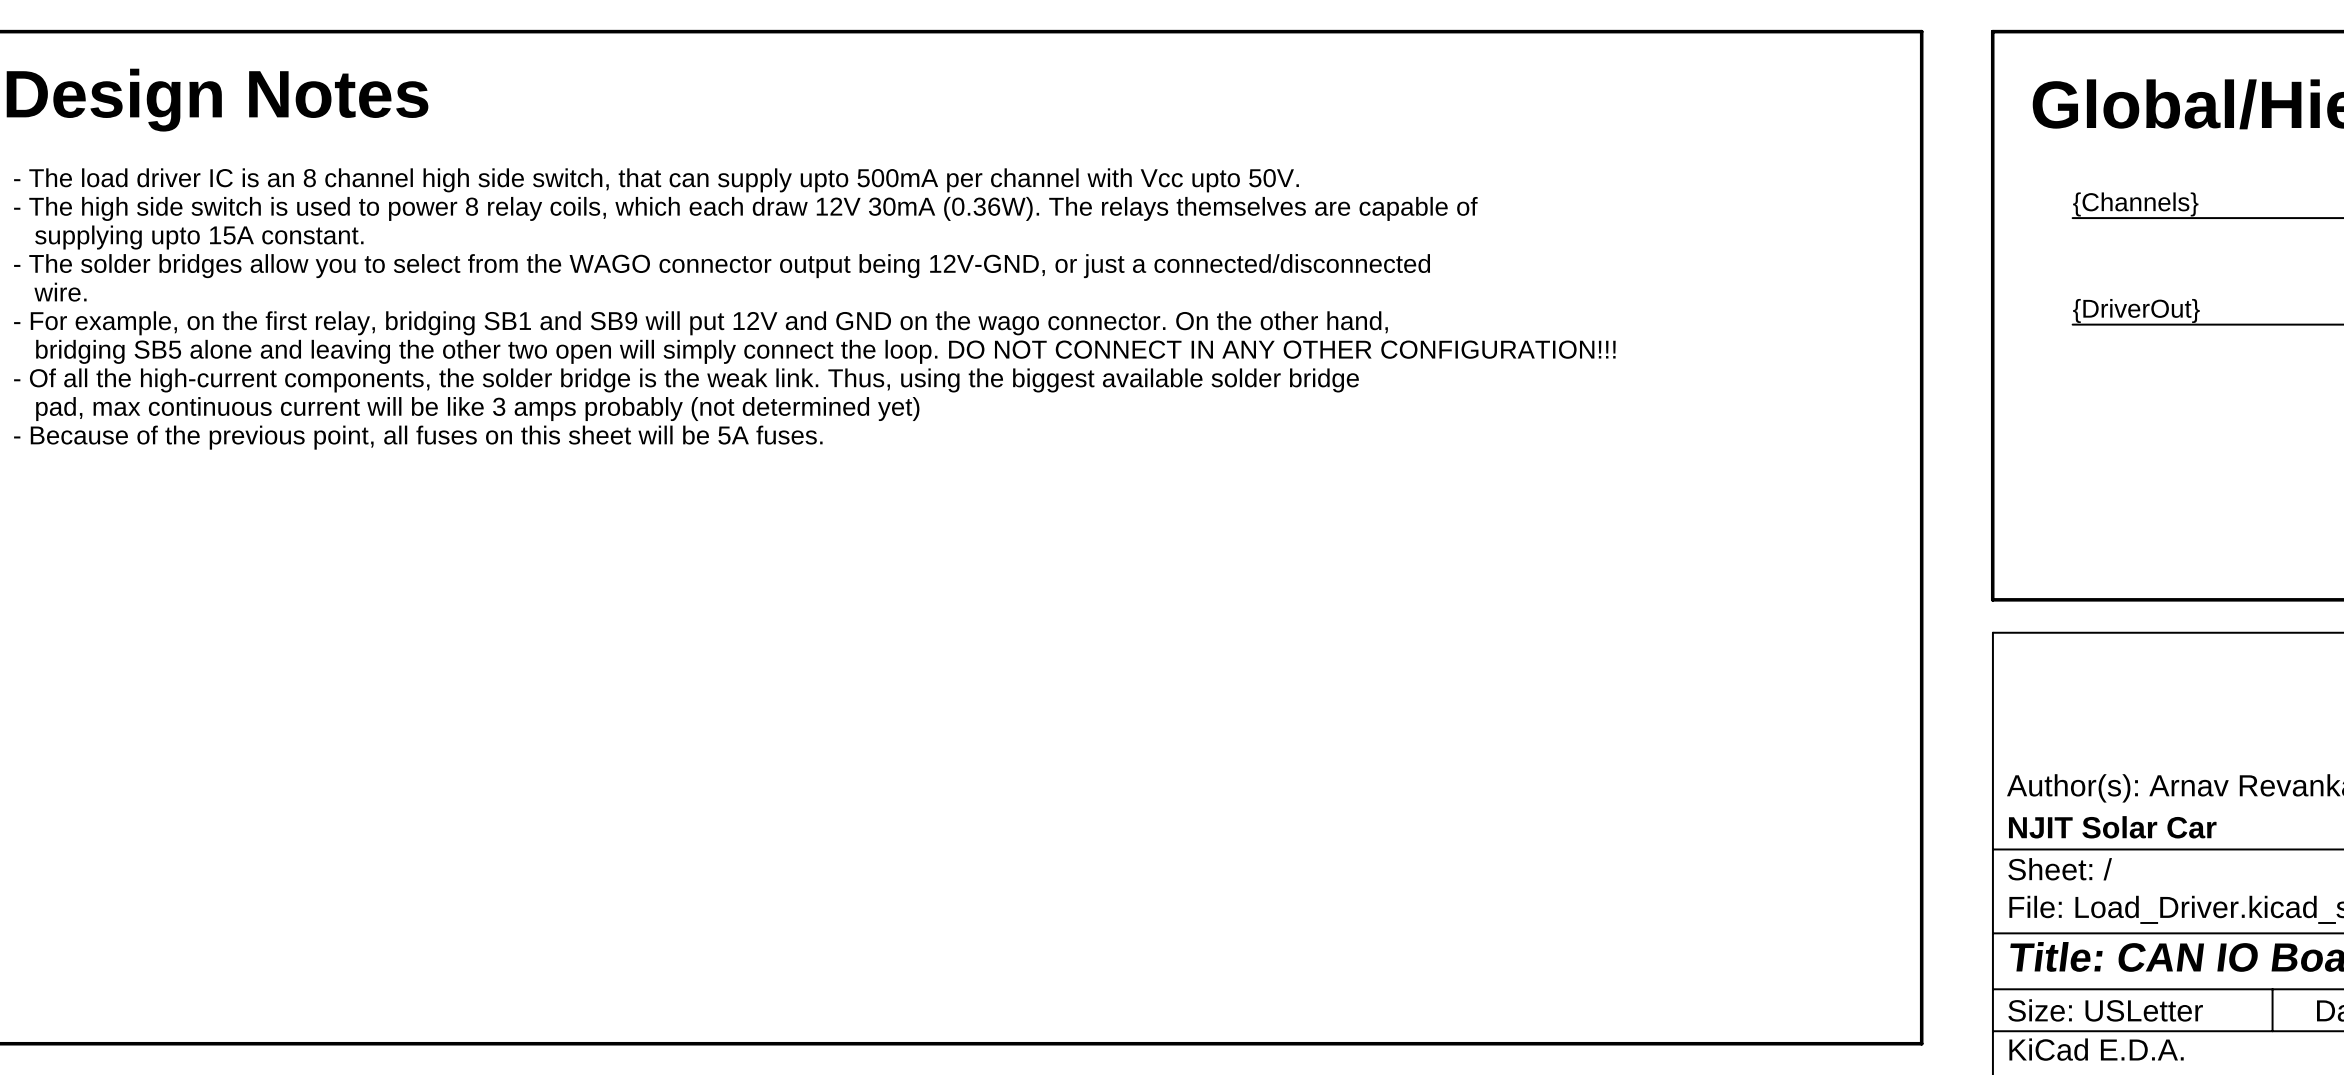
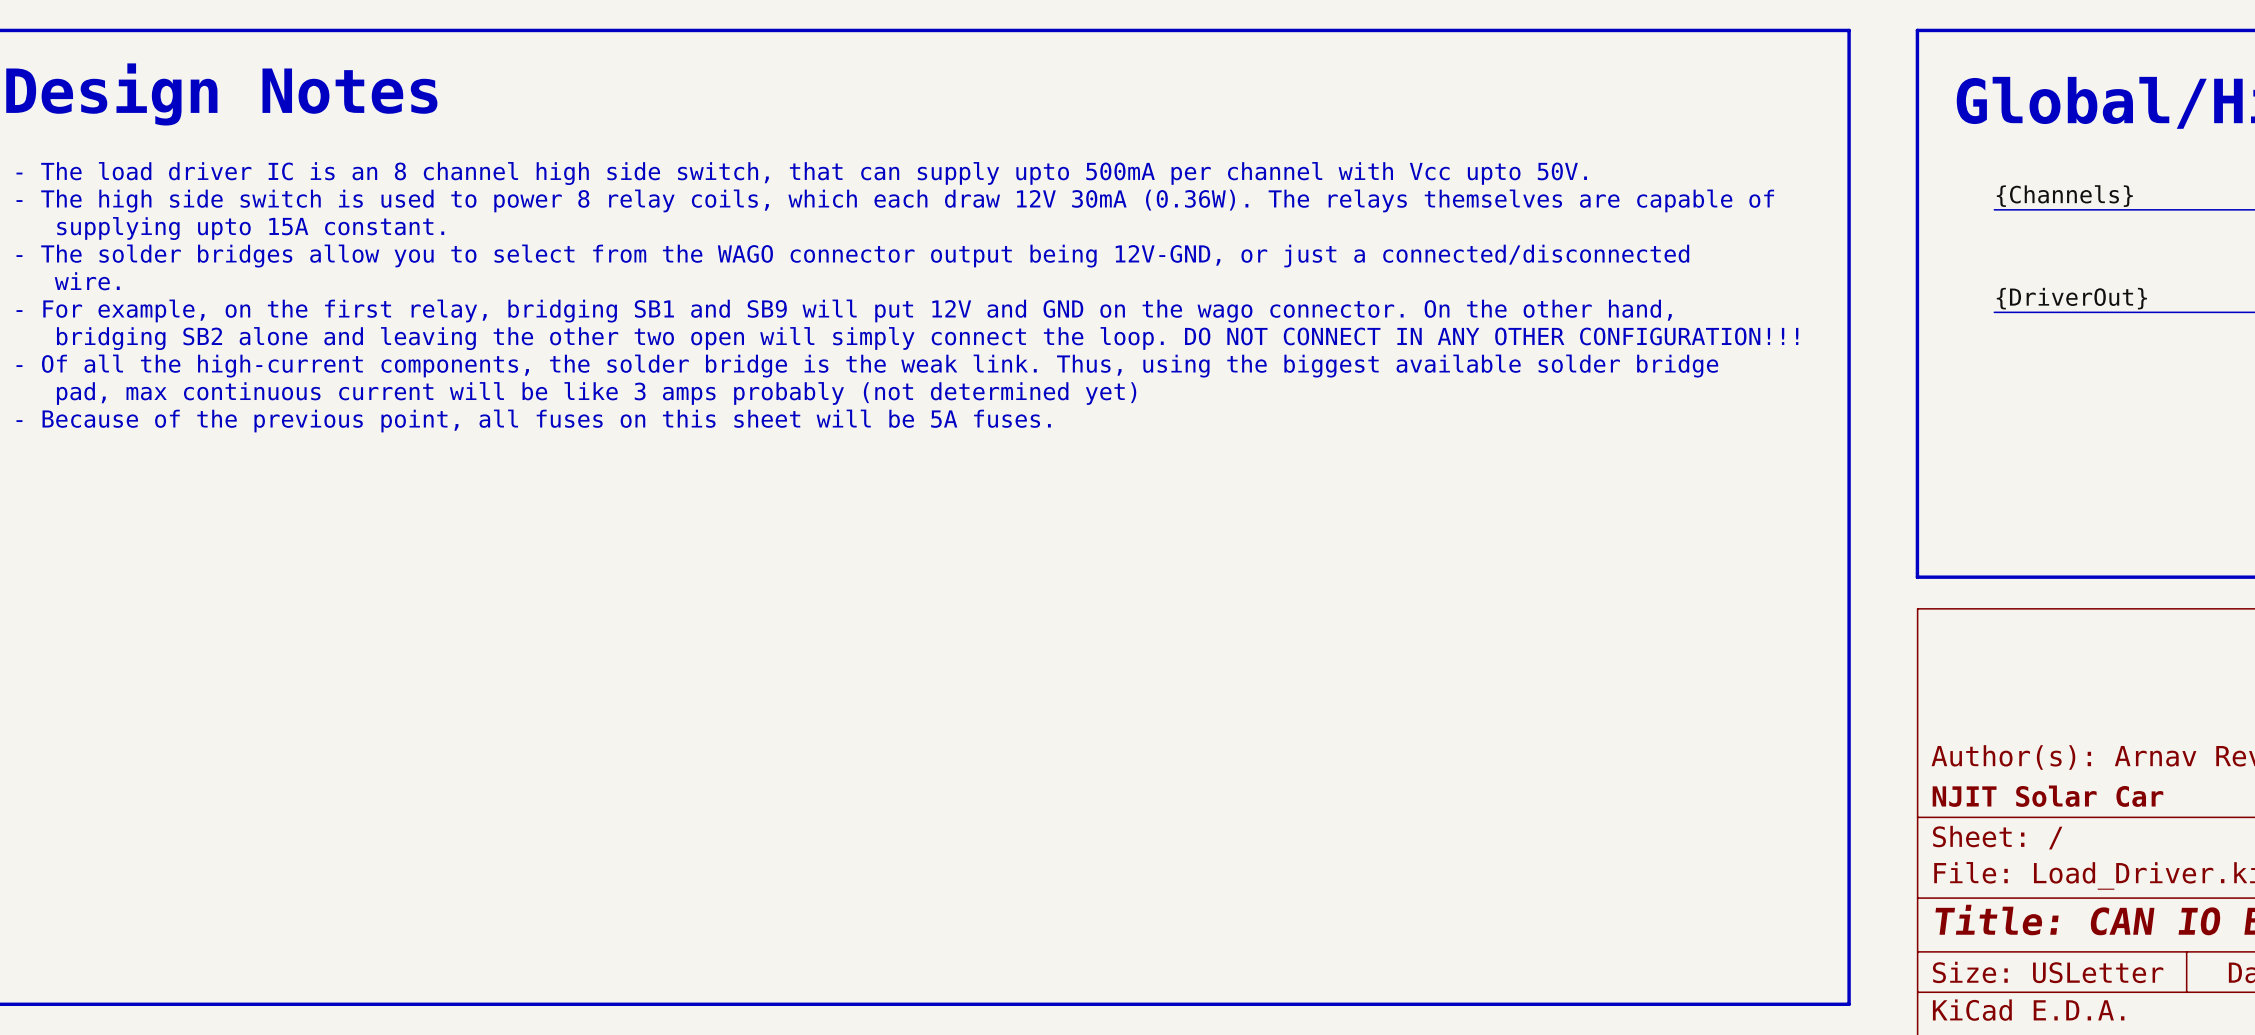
text: bridging SB5 alone and leaving the other two open will simply connect the loop. DO NOT CONNECT IN ANY OTHER CONFIGURATION!!! (825, 351) -> bridging SB2 alone and leaving the other two open will simply connect the loop. DO NOT CONNECT IN ANY OTHER CONFIGURATION!!! (927, 338)

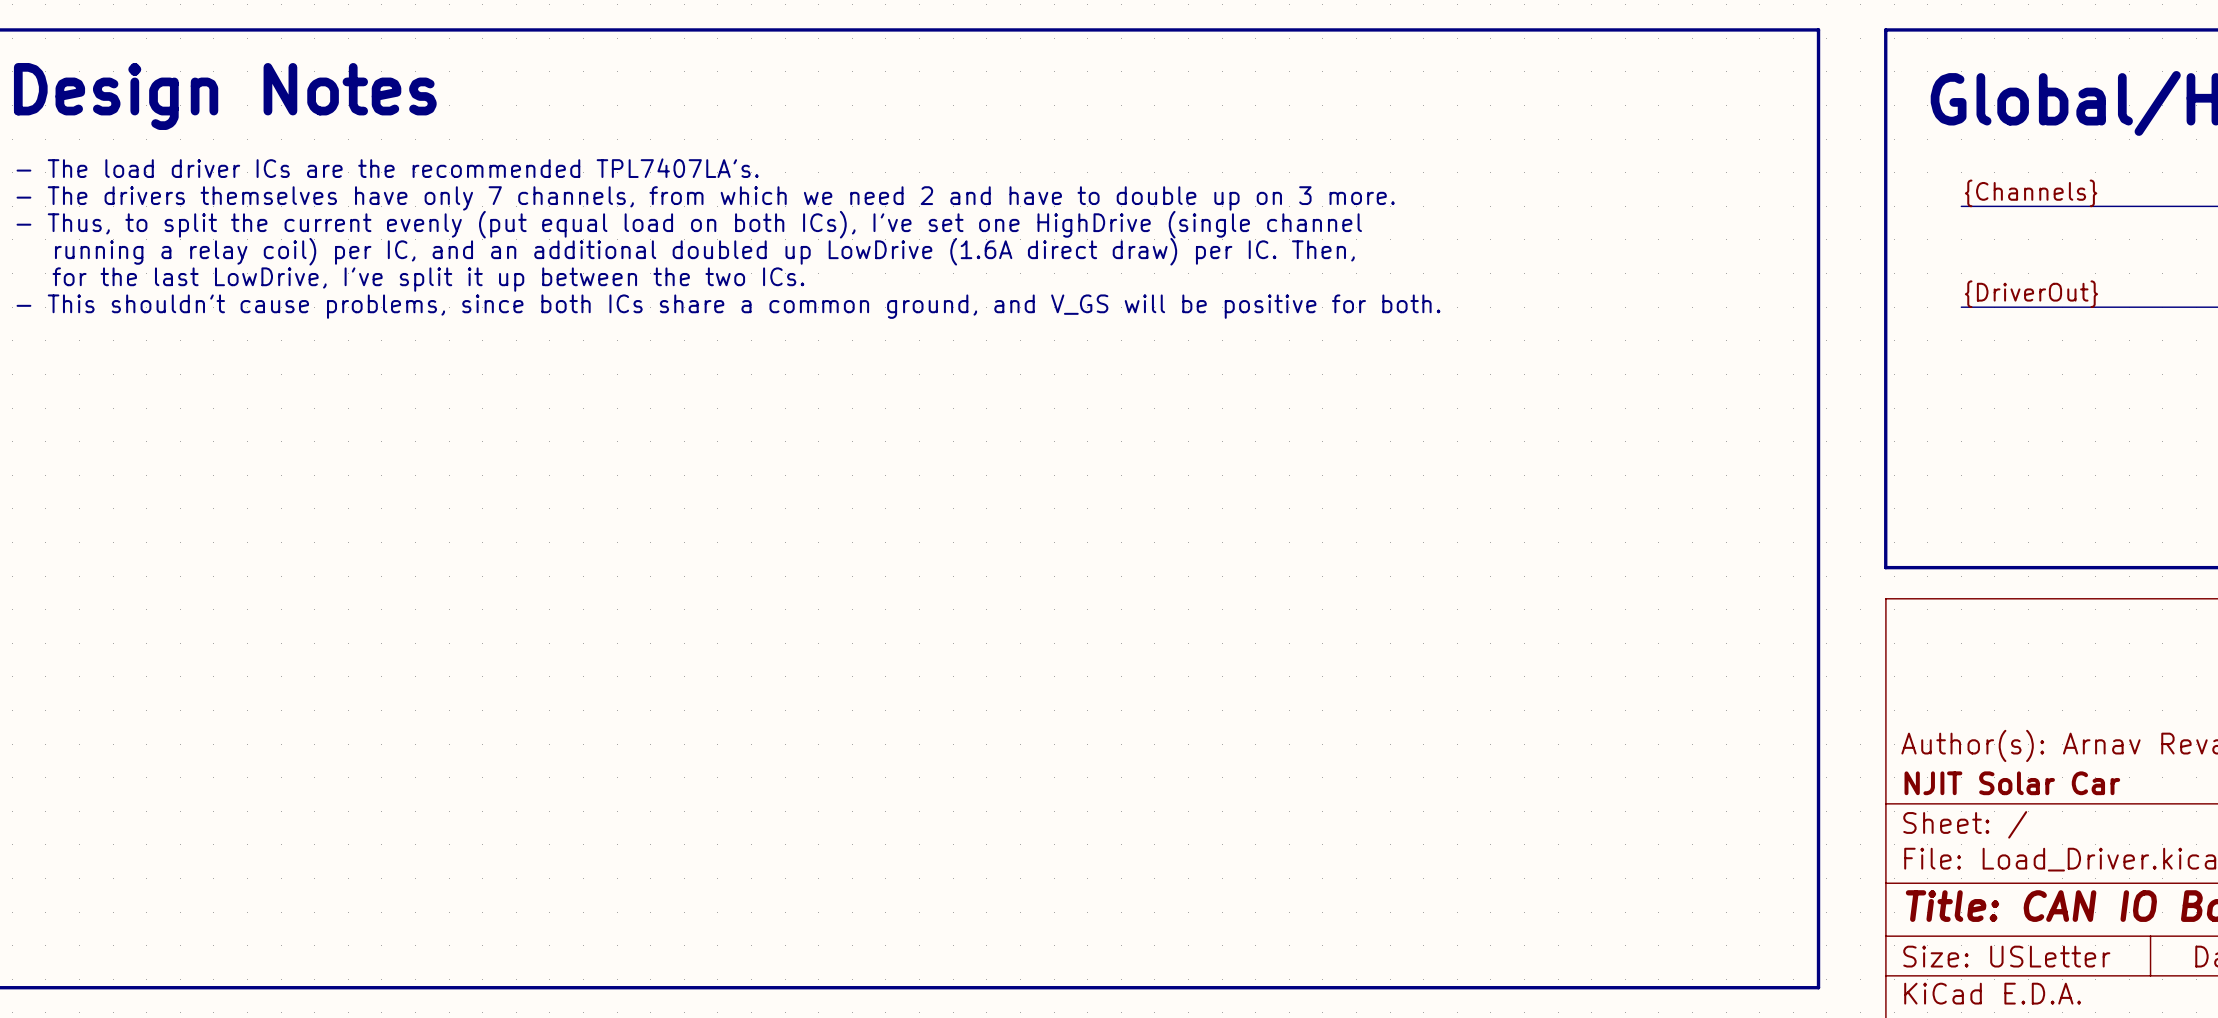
text: - The load driver IC is an 8 channel high side switch, that can supply upto 500mA per channel with Vcc upto 50V. (801, 173) -> - The load driver ICs are the recommended TPL7407LA's. (387, 168)
text: - The high side switch is used to power 8 relay coils, which each draw 12V 30mA (0.36W). The relays themselves are capable of (895, 201) -> - The drivers themselves have only 7 channels, from which we need 2 and have to double up on 3 more. (705, 198)
text: supplying upto 15A constant. (250, 228) -> - Thus, to split the current evenly (put equal load on both ICs), I've set one HighDrive (single channel (689, 224)
text: - The solder bridges allow you to select from the WAGO connector output being 12V-GND, or just a connected/disconnected (852, 256) -> running a relay coil) per IC, and an additional doubled up LowDrive (1.6A direct draw) per IC. Then, (704, 251)
text: wire. (87, 281) -> for the last LowDrive, I've split it up between the two ICs. (428, 279)
text: - For example, on the first relay, bridging SB1 and SB9 will put 12V and GND on the wago connector. On the other hand, (844, 311) -> - This shouldn't cause problems, since both ICs share a common ground, and V_GS will be positive for both. (728, 306)
text: bridging SB2 alone and leaving the other two open will simply connect the loop. DO NOT CONNECT IN ANY OTHER CONFIGURATION!!! (927, 338) -> none
text: - Of all the high-current components, the solder bridge is the weak link. Thus, using the biggest available solder bridge (867, 366) -> none
text: pad, max continuous current will be like 3 amps probably (not determined yet) (596, 393) -> none
text: - Because of the previous point, all fuses on this sheet will be 5A fuses. (533, 420) -> none

